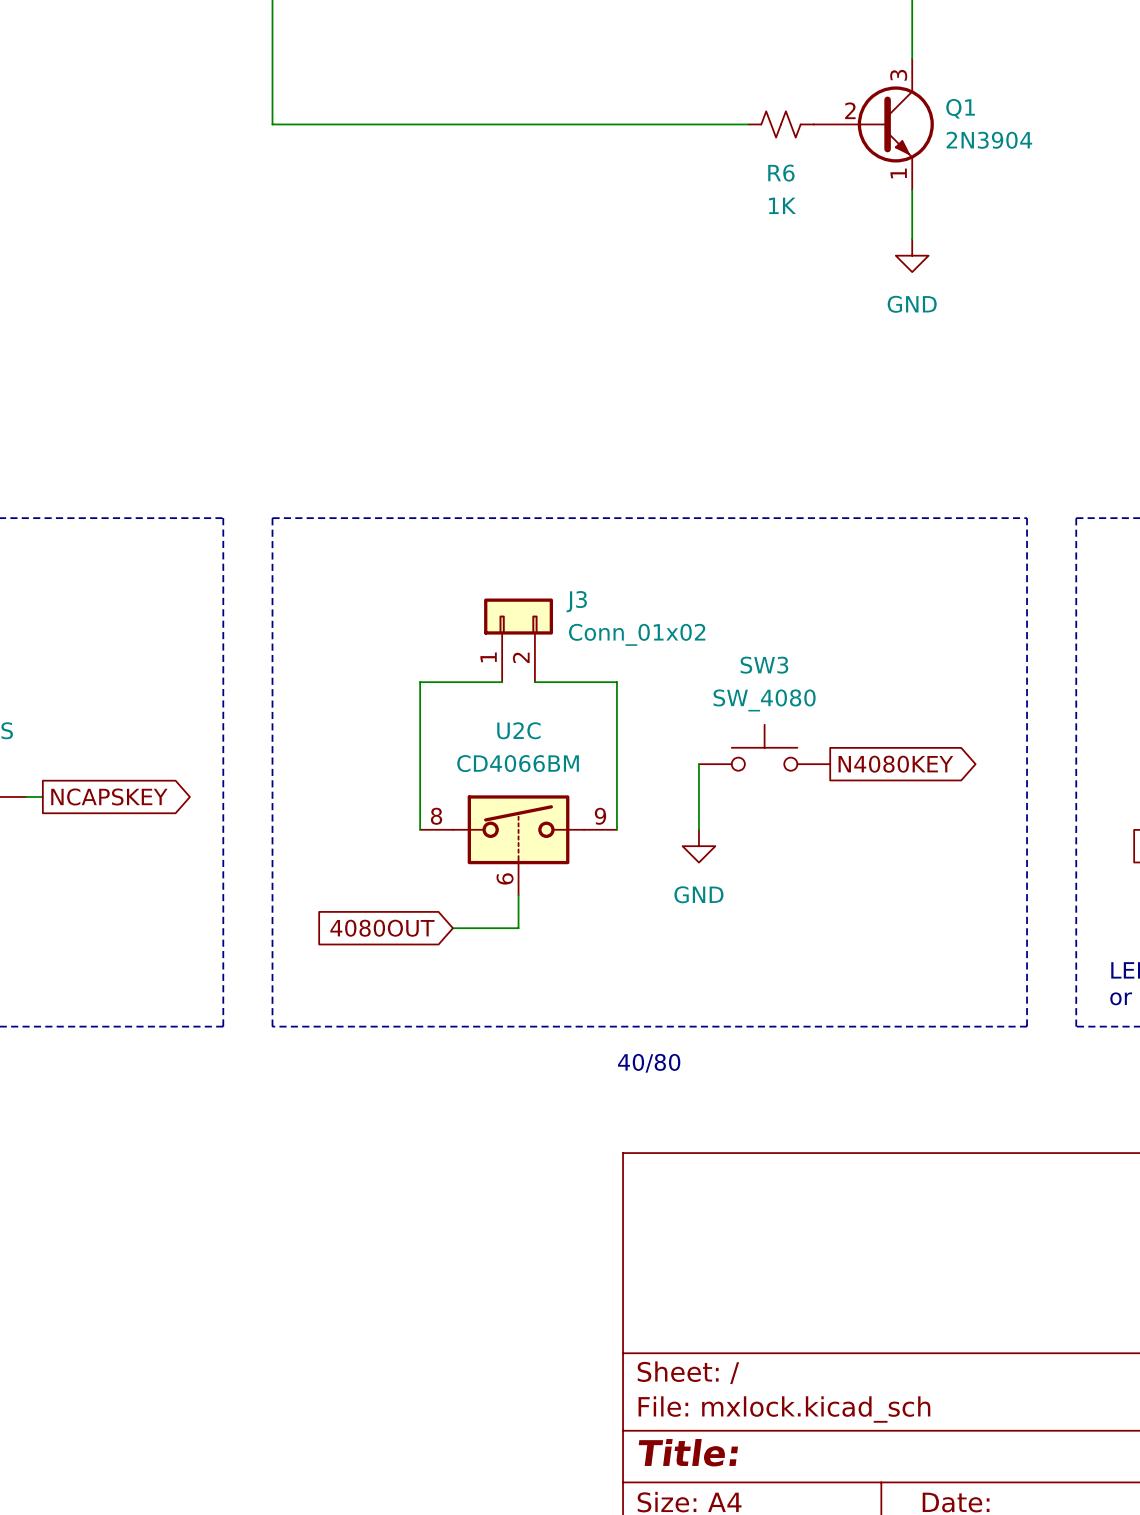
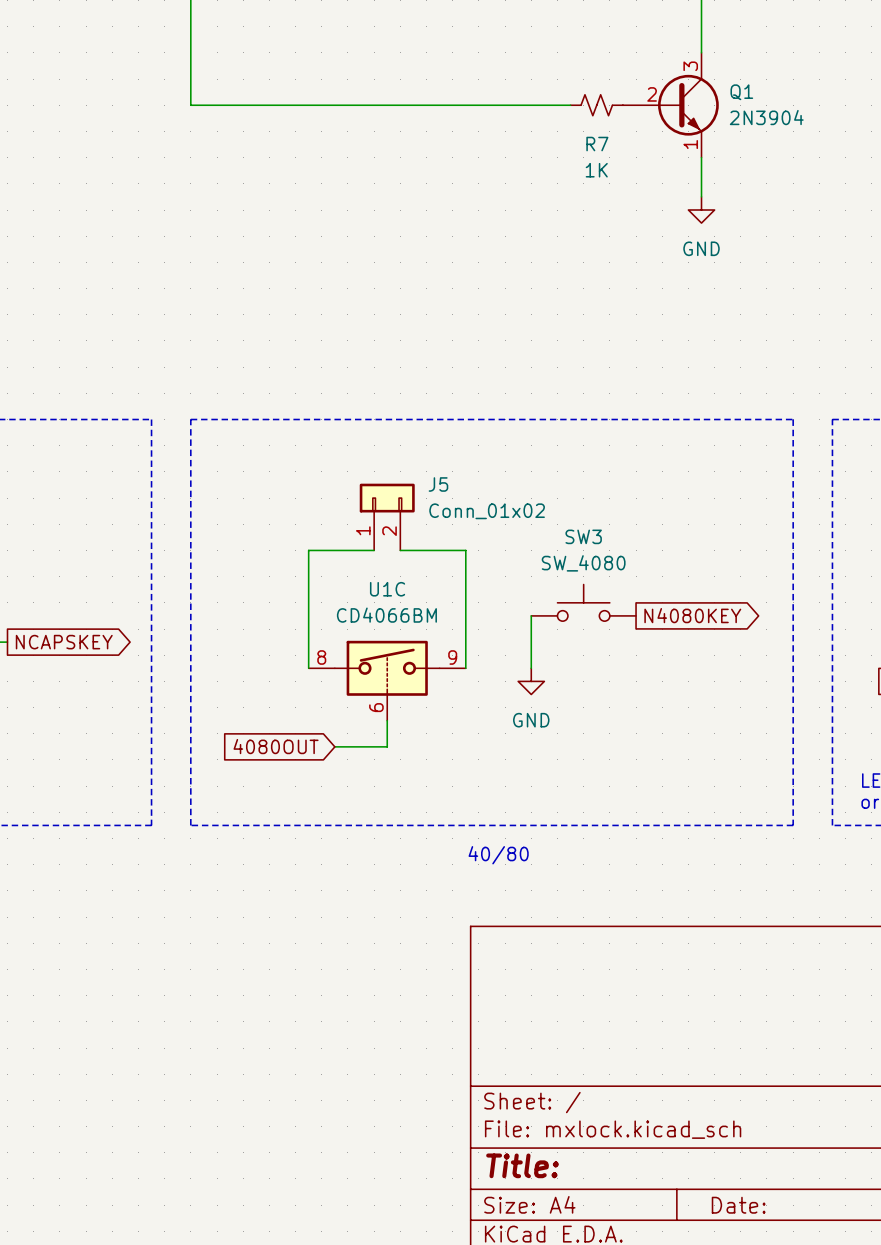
R6 name: R6 (781, 173) -> R7 (597, 144)
J3 name: J3 (576, 601) -> J5 (438, 484)
U2C name: U2C (518, 730) -> U1C (387, 589)

